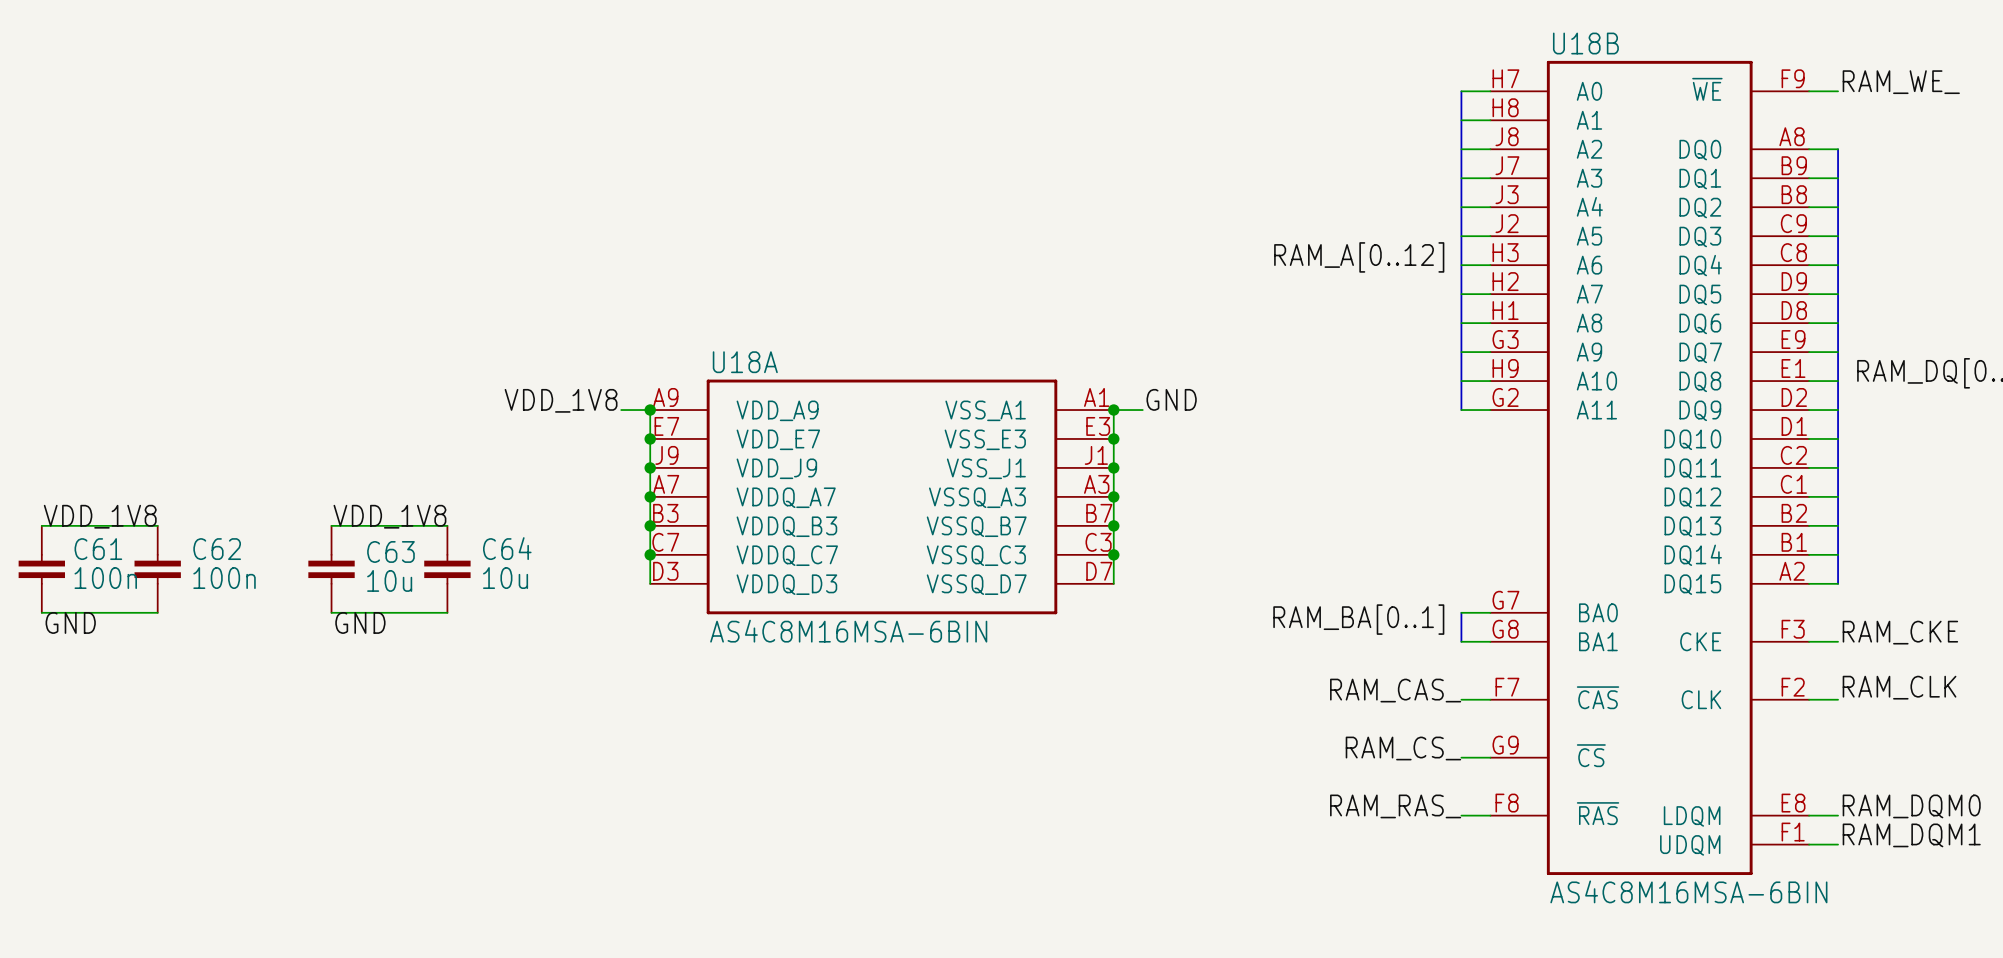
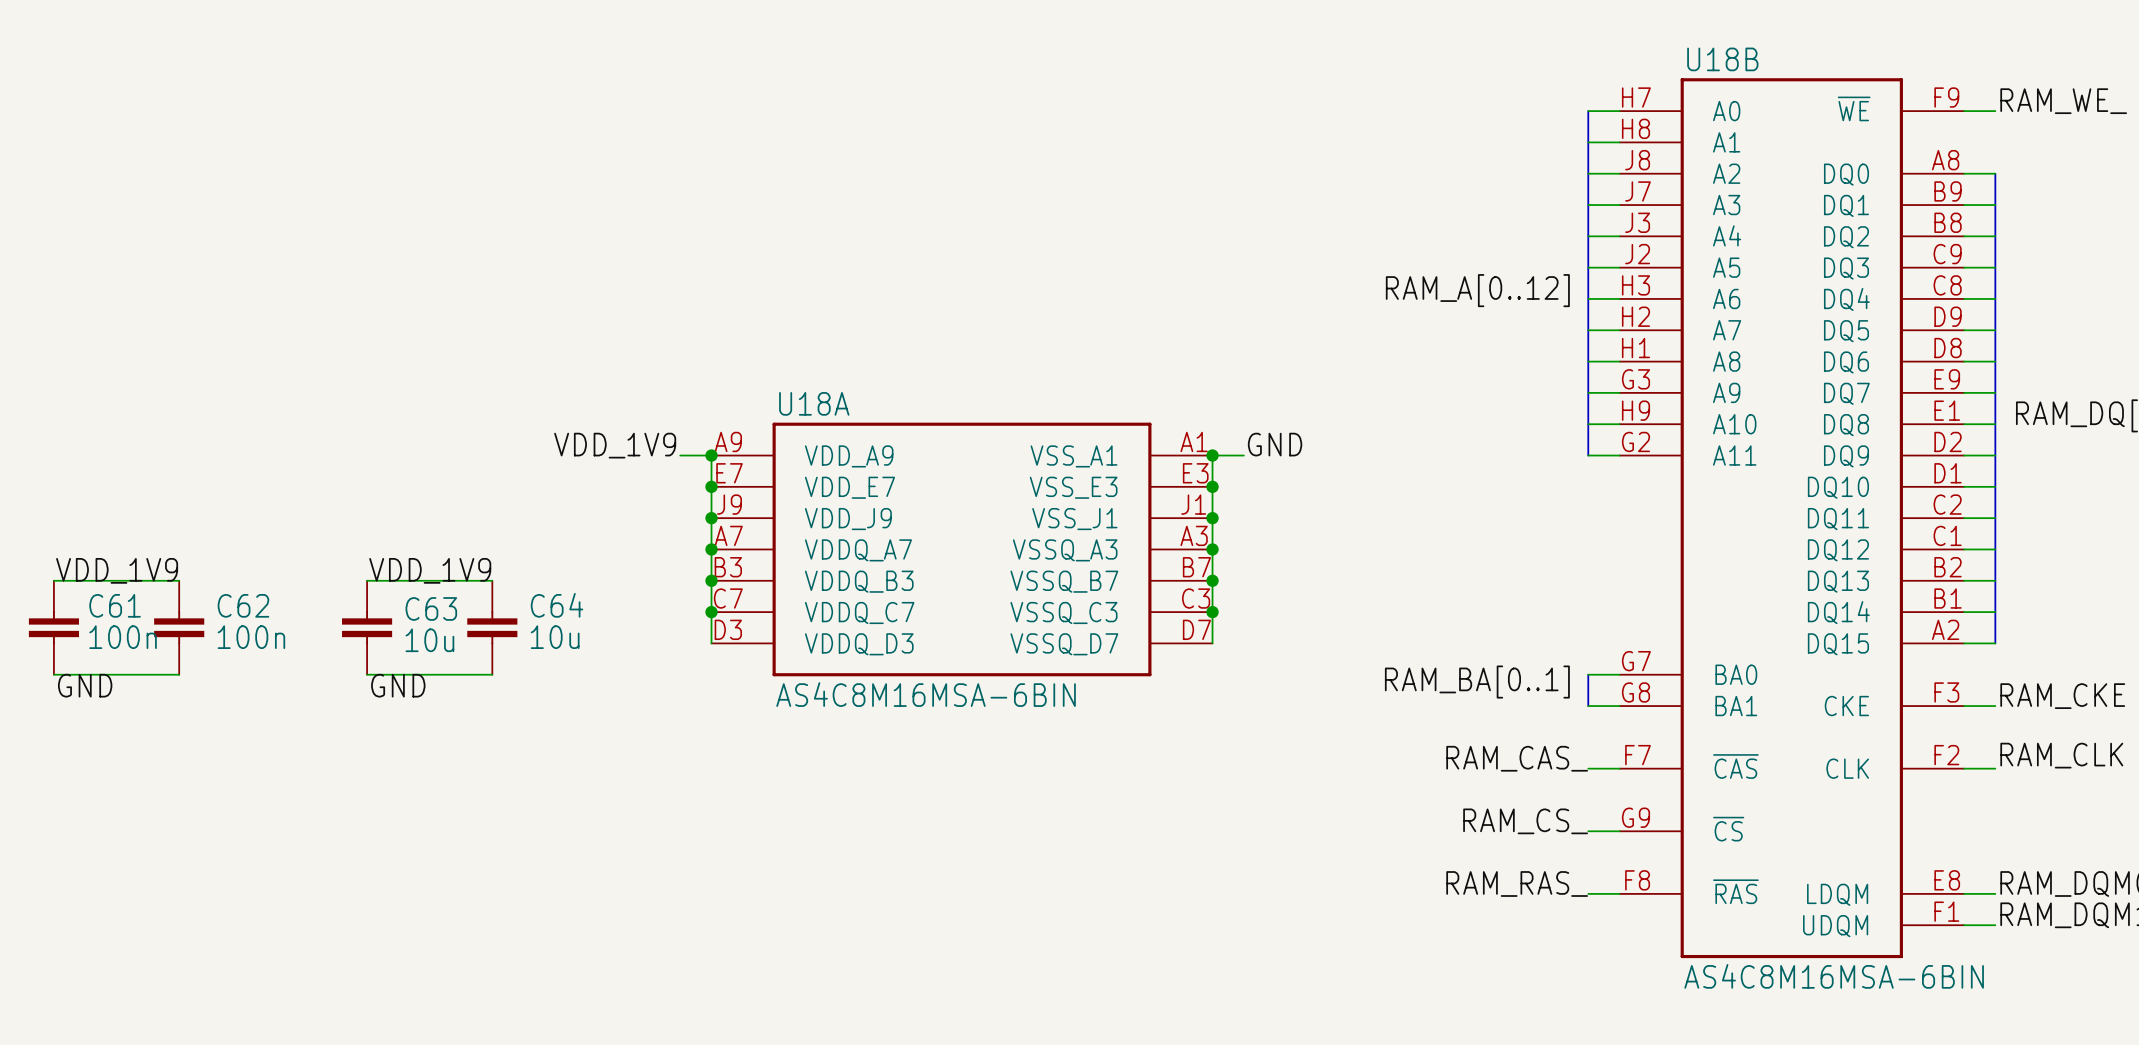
label: VDD_1V8 (561, 400) -> VDD_1V9 (615, 445)
label: VDD_1V8 (100, 516) -> VDD_1V9 (117, 570)
label: VDD_1V8 (389, 516) -> VDD_1V9 (430, 570)

